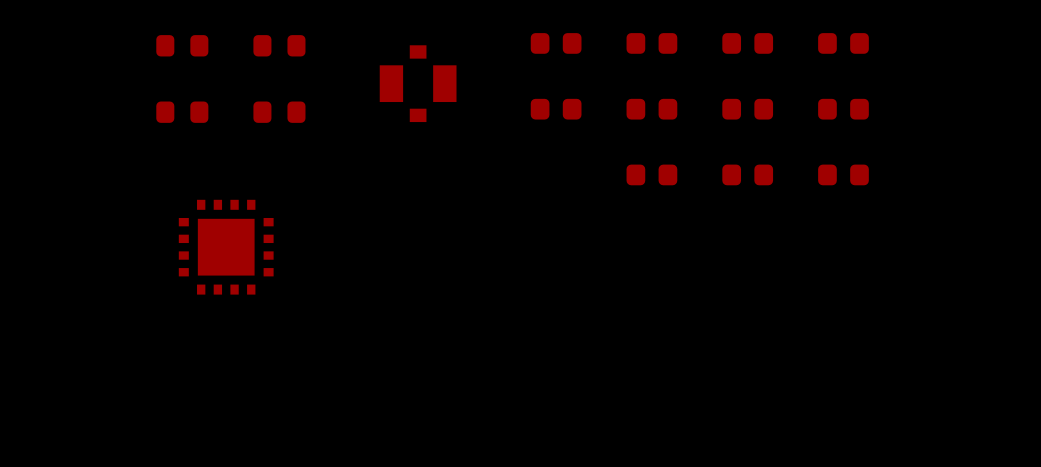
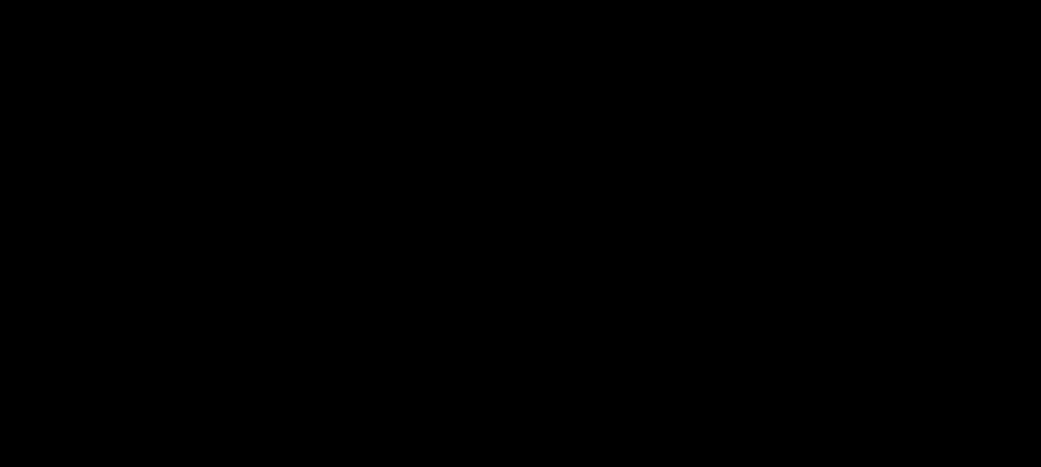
part: (556, 43) -> none
part: (651, 43) -> none
part: (747, 43) -> none
part: (843, 43) -> none
part: (182, 45) -> none
part: (279, 45) -> none
part: (418, 83) -> none
part: (556, 109) -> none
part: (651, 109) -> none
part: (747, 109) -> none
part: (843, 109) -> none
part: (182, 112) -> none
part: (279, 112) -> none
part: (651, 174) -> none
part: (747, 174) -> none
part: (843, 174) -> none
part: (226, 247) -> none

